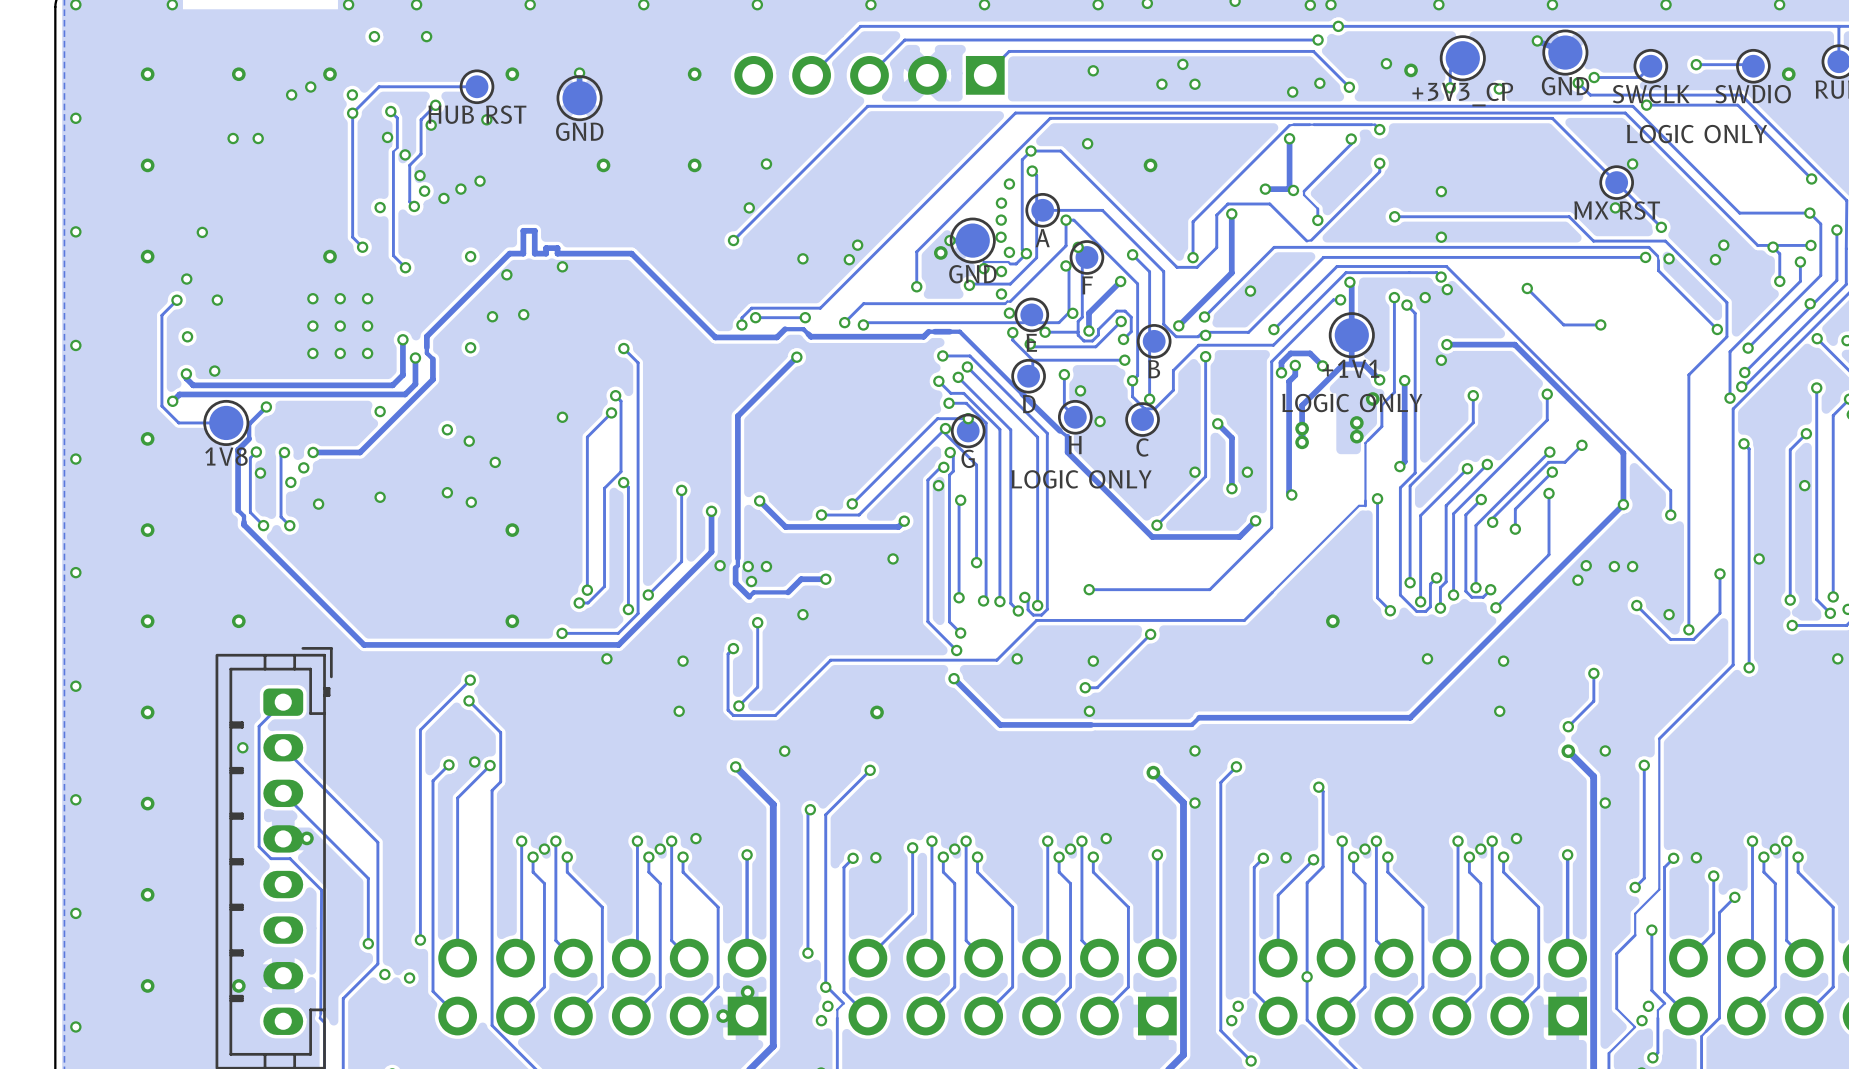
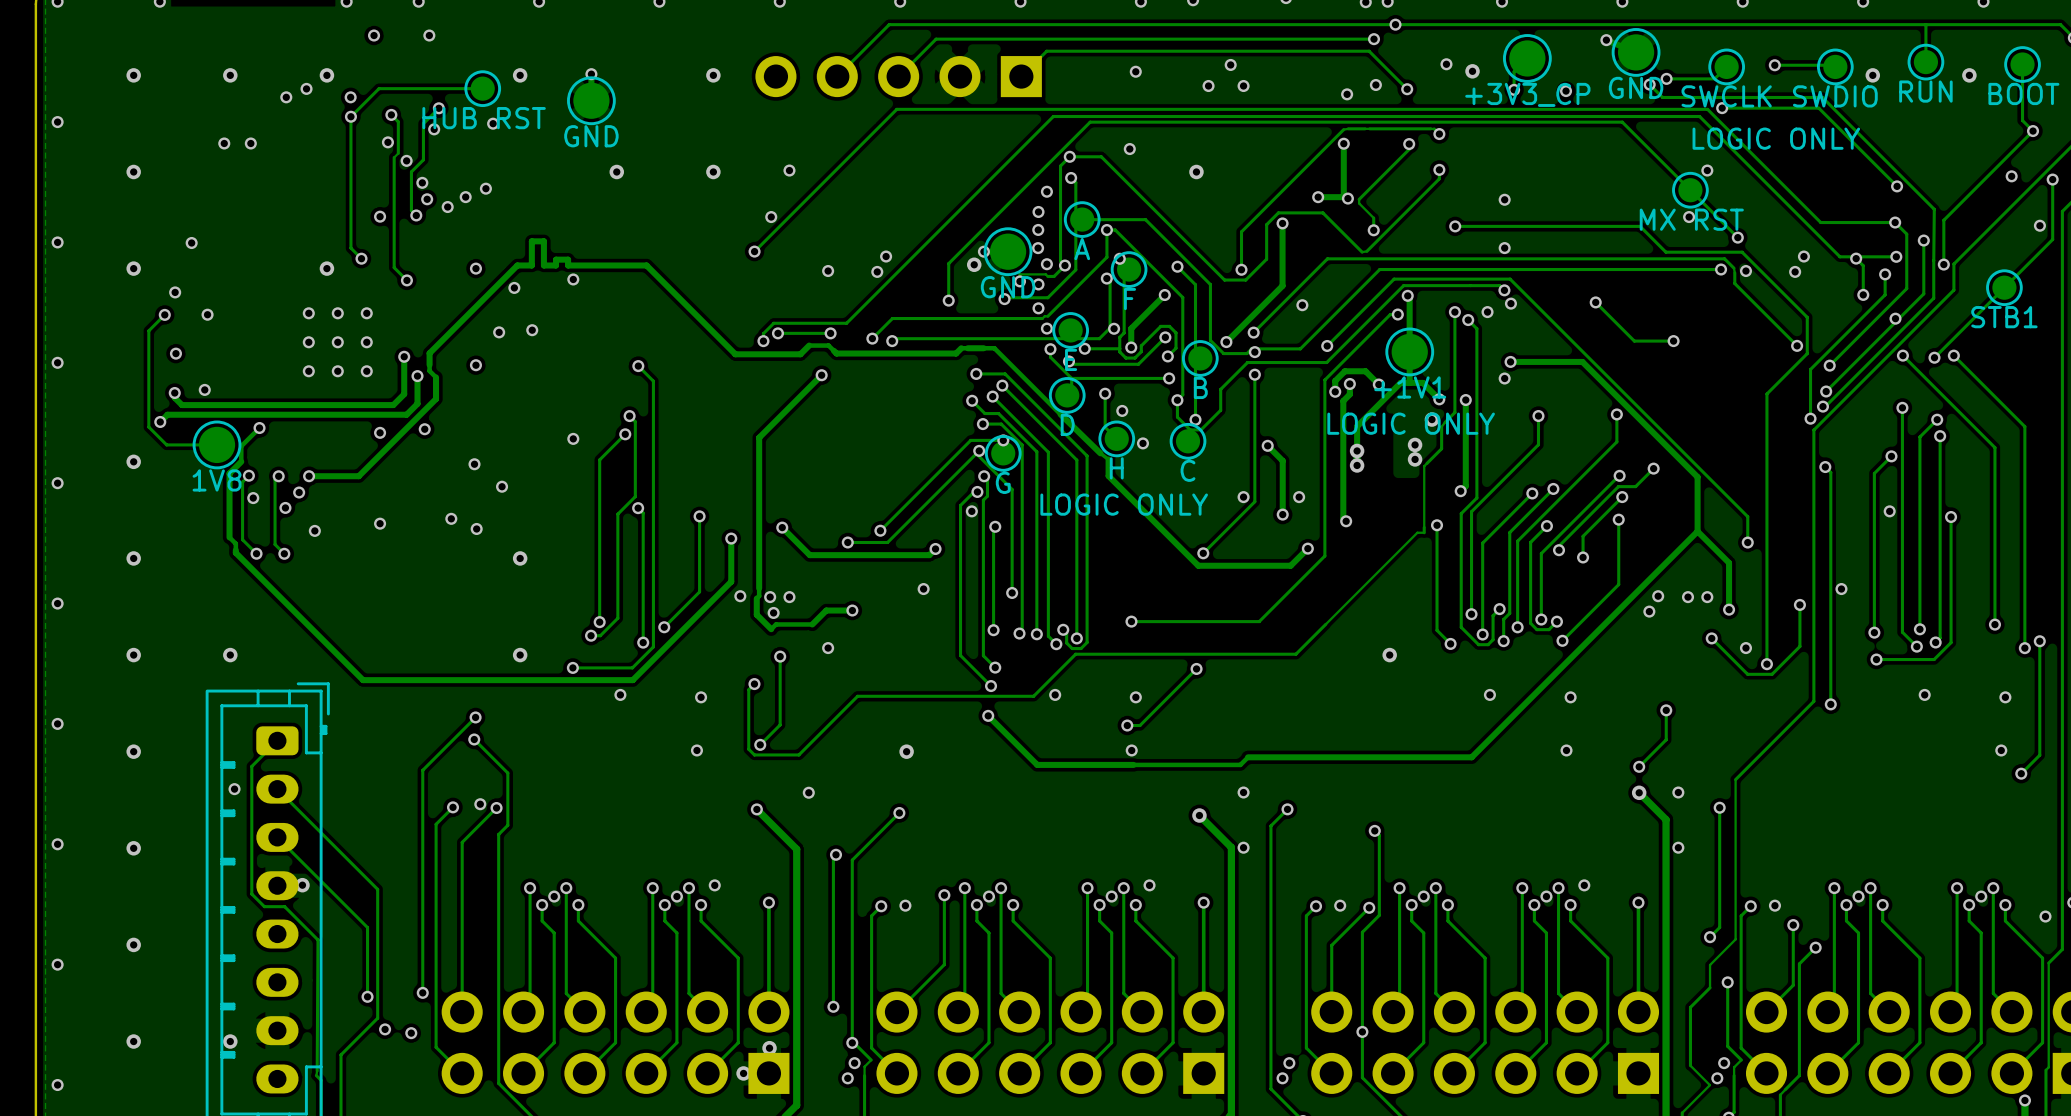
via position: (447, 429) -> (424, 429)
track: none -> (1697, 531) (1729, 562) (1729, 609)
via position: (1623, 504) -> (1729, 609)

